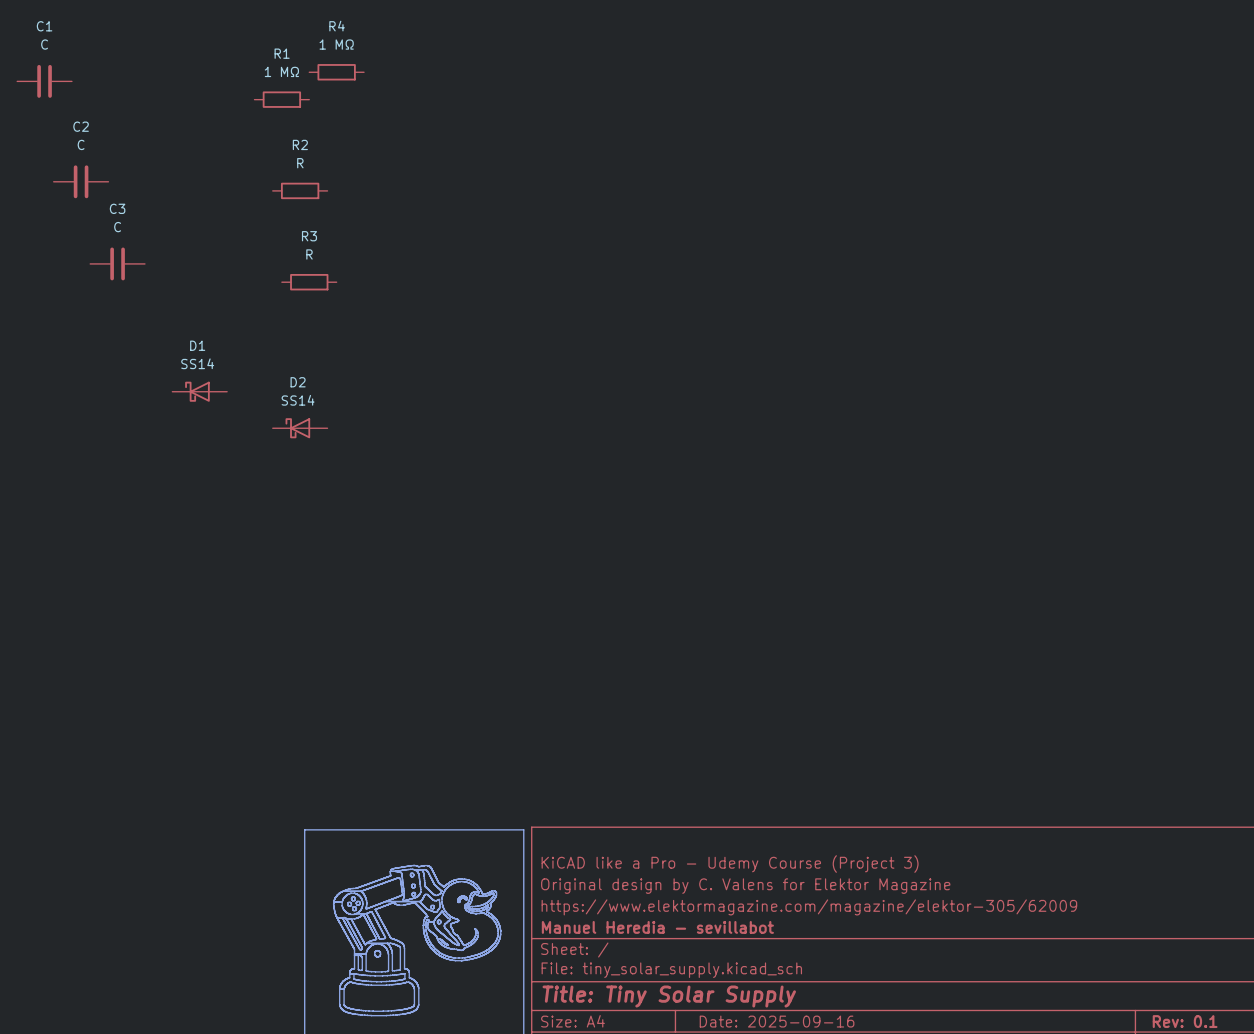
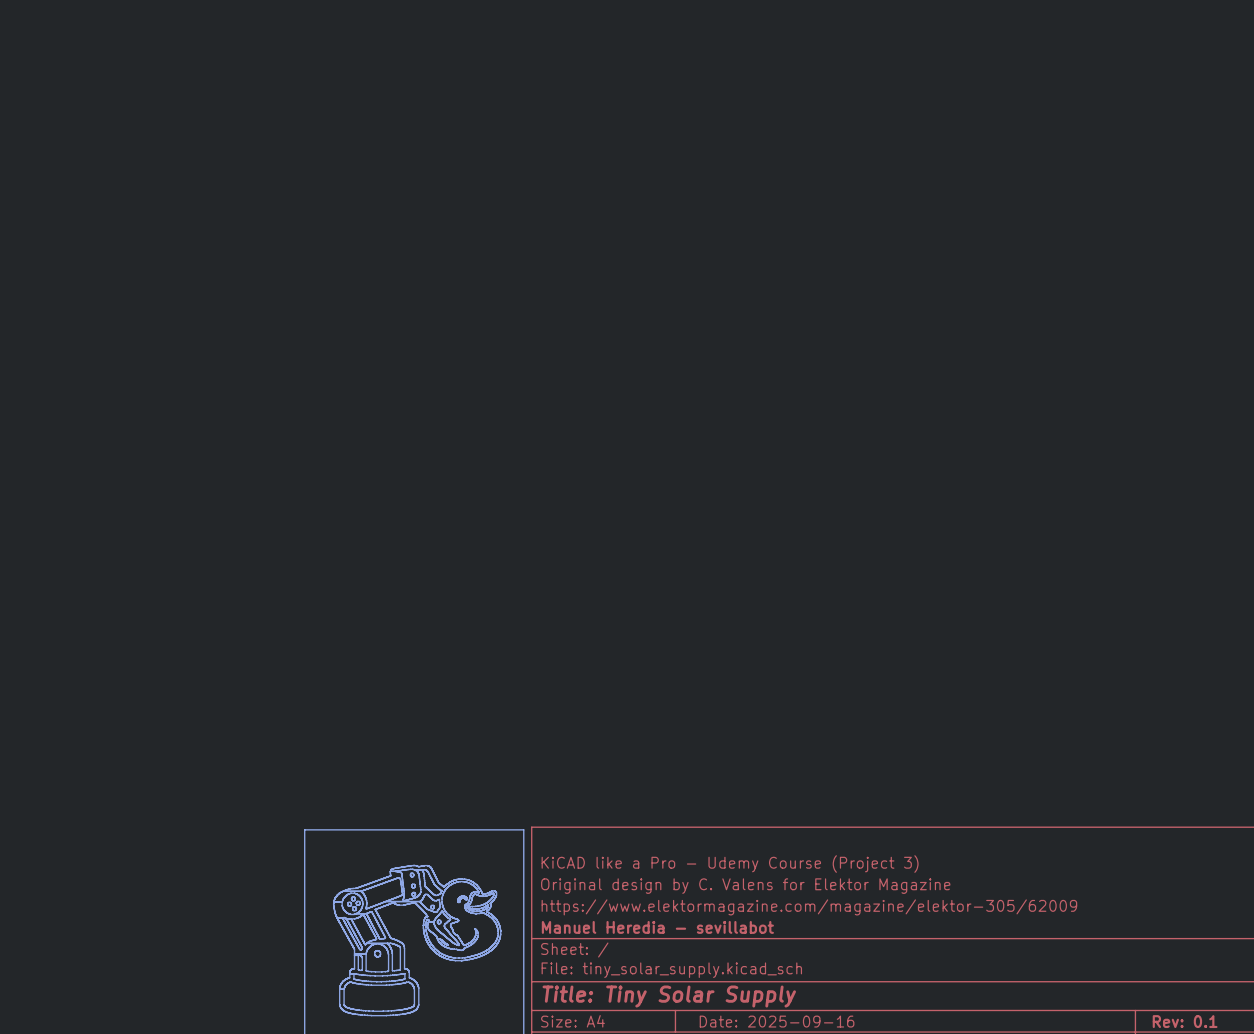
R4: 1 MΩ (336, 72) -> none
C1: C (44, 81) -> none
R1: 1 MΩ (281, 99) -> none
C2: C (81, 181) -> none
R2: R (300, 190) -> none
C3: C (117, 263) -> none
R3: R (309, 282) -> none
D1: SS14 (199, 391) -> none
D2: SS14 (300, 428) -> none

